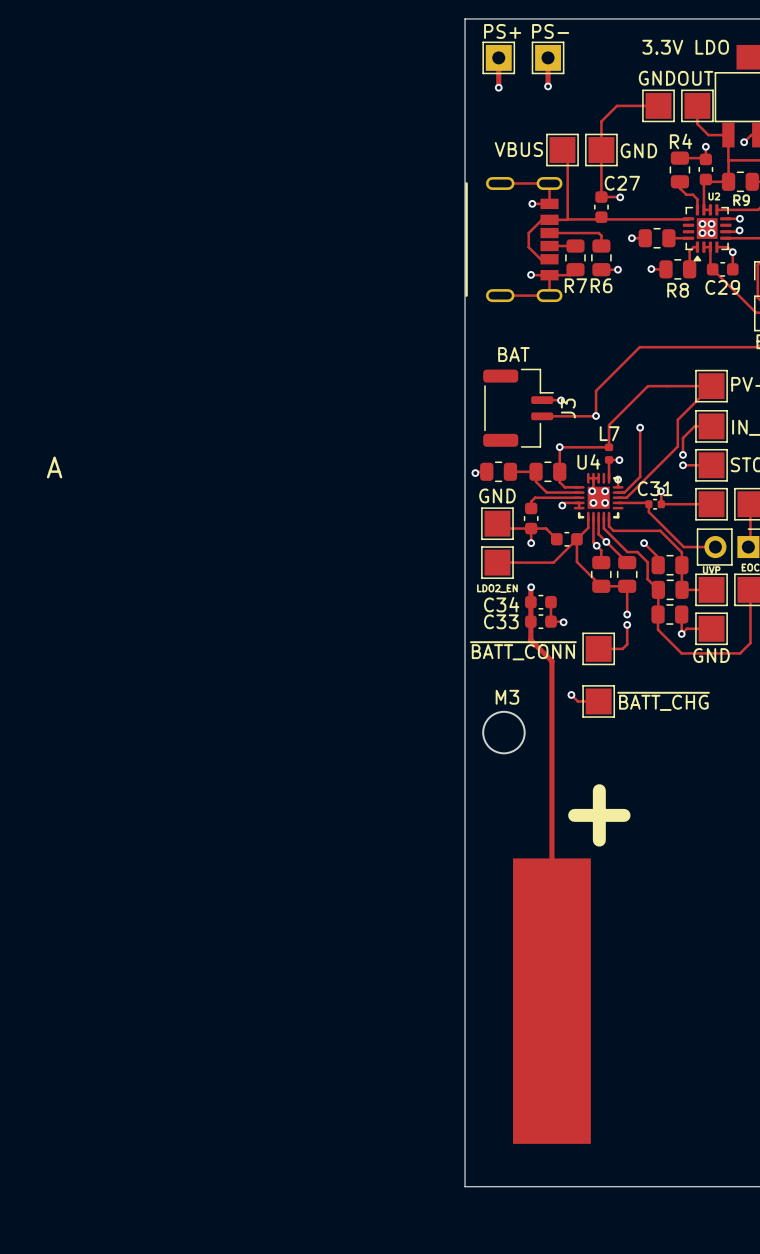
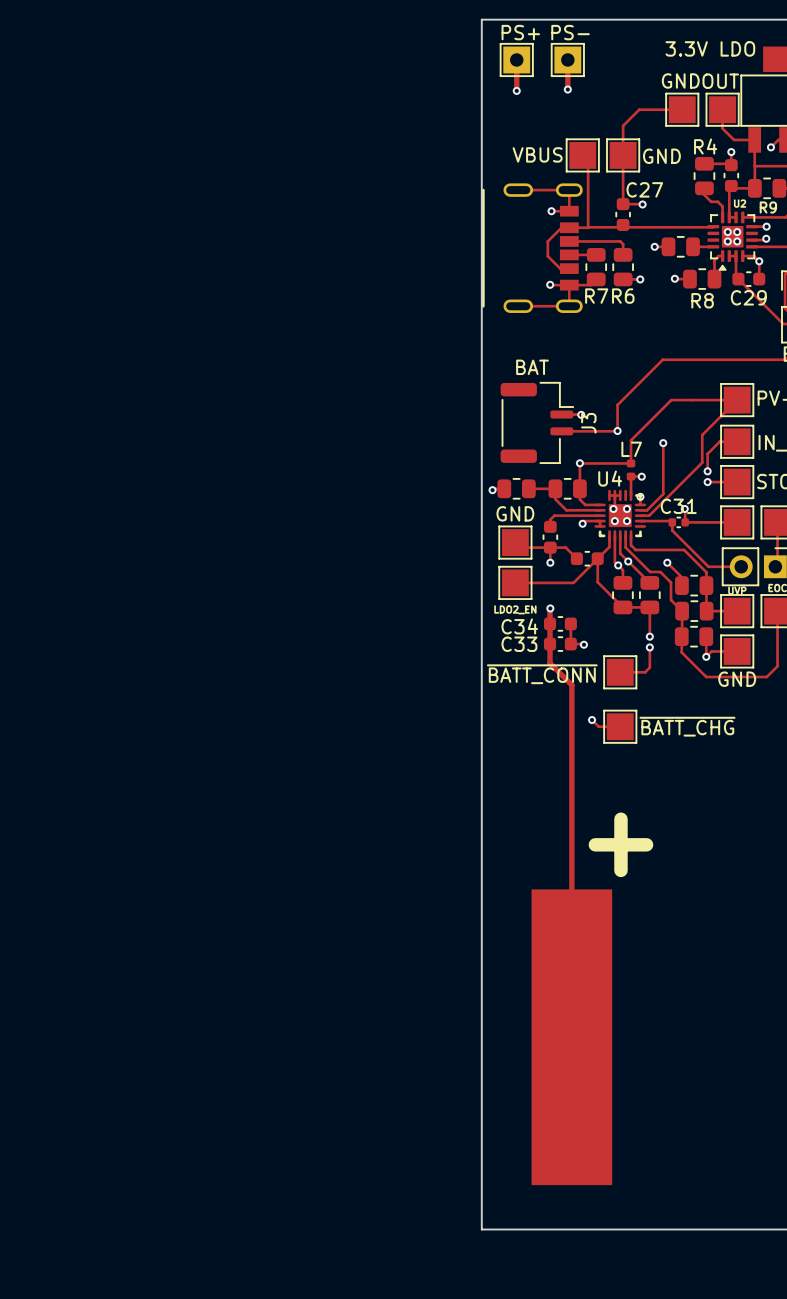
text: A (54, 467) -> none
text: M3 (507, 697) -> none
round board edge: [482, 710, 526, 755] -> none

